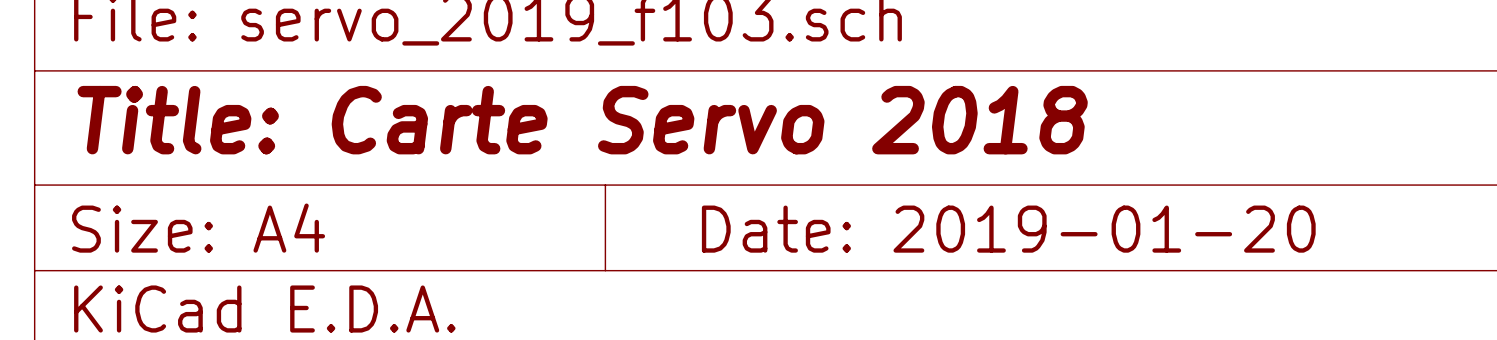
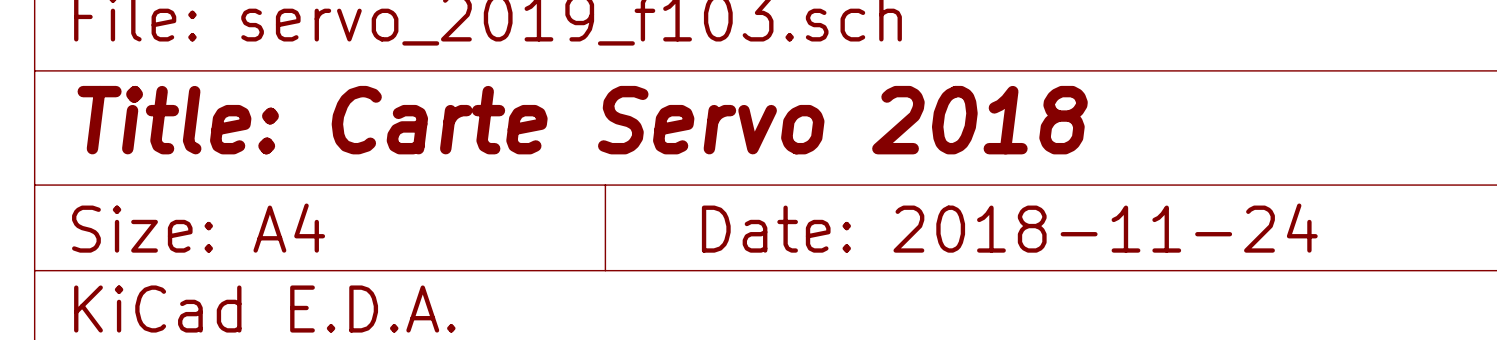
title block: Date: 2019-01-20 (1008, 229) -> Date: 2018-11-24 (1009, 228)

